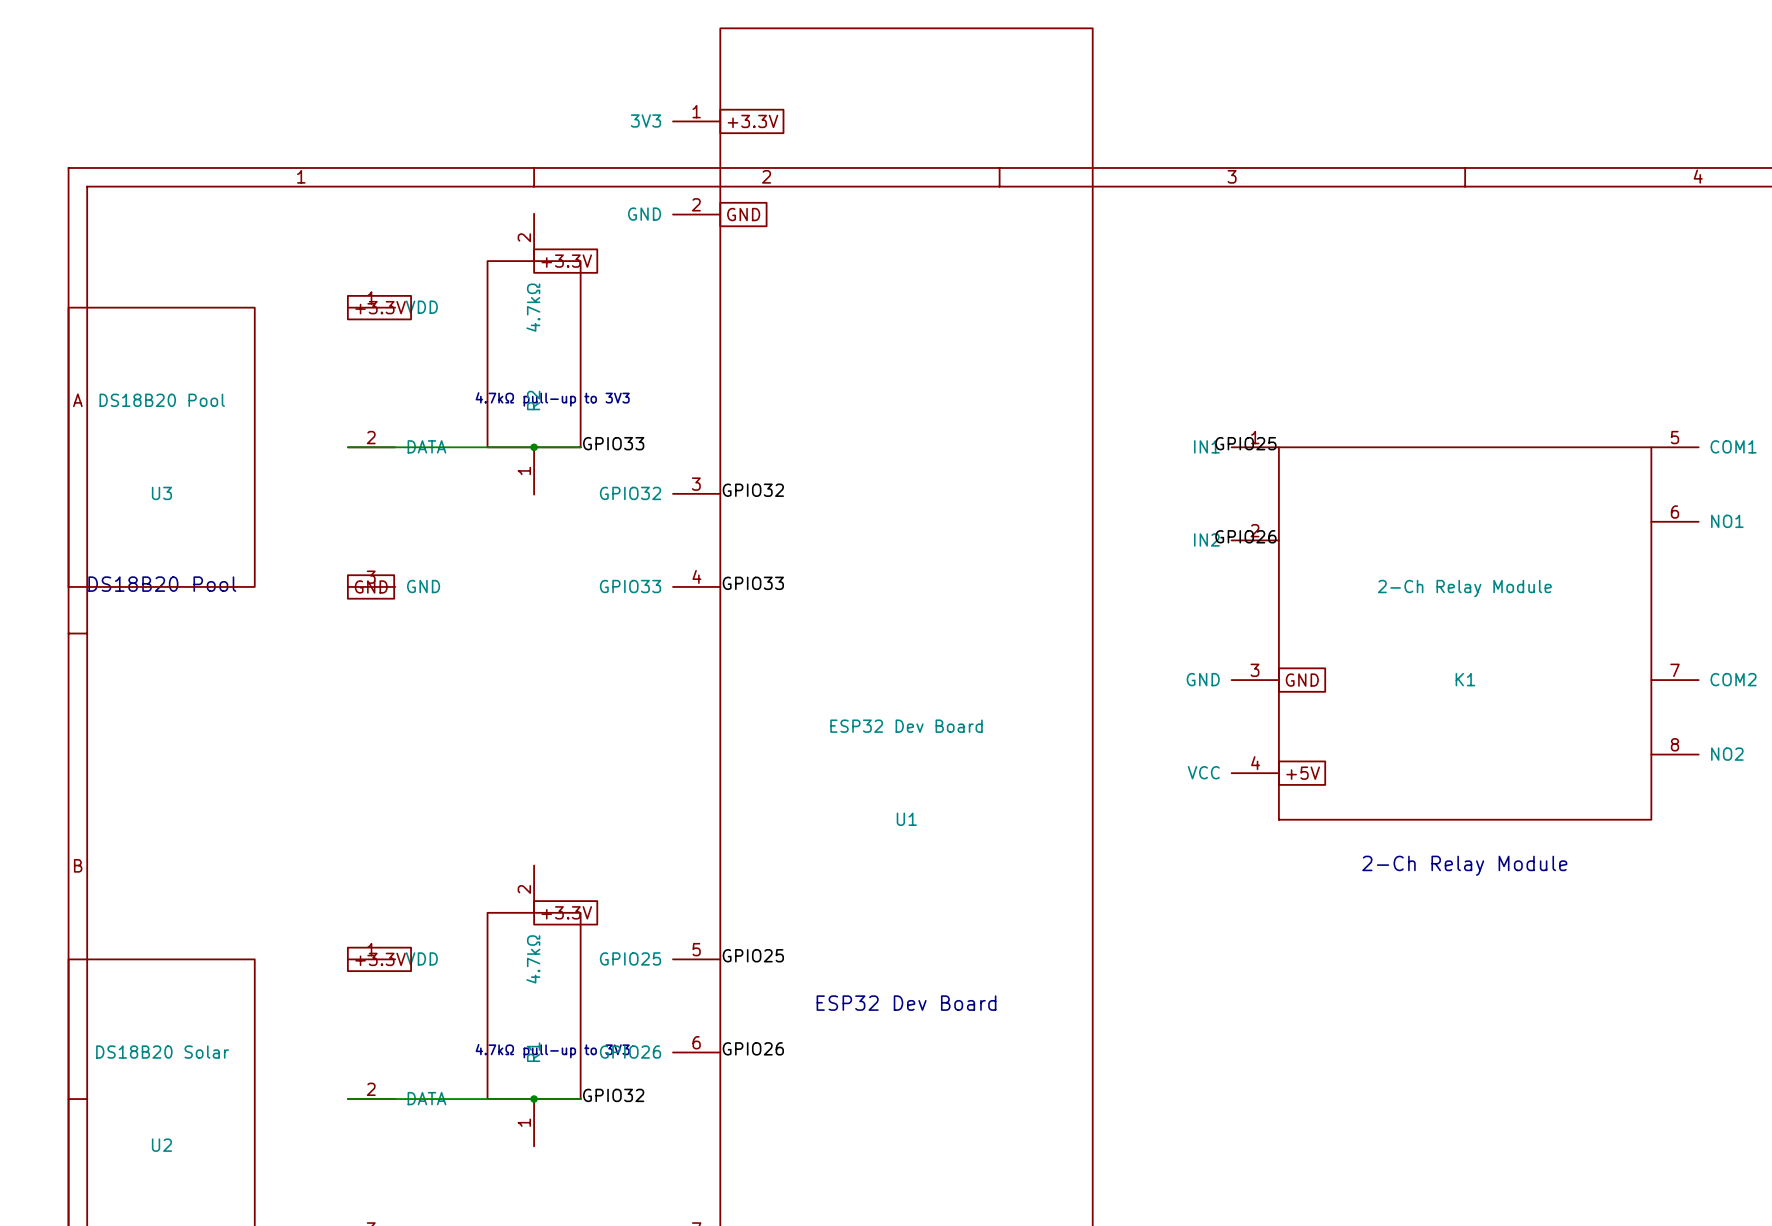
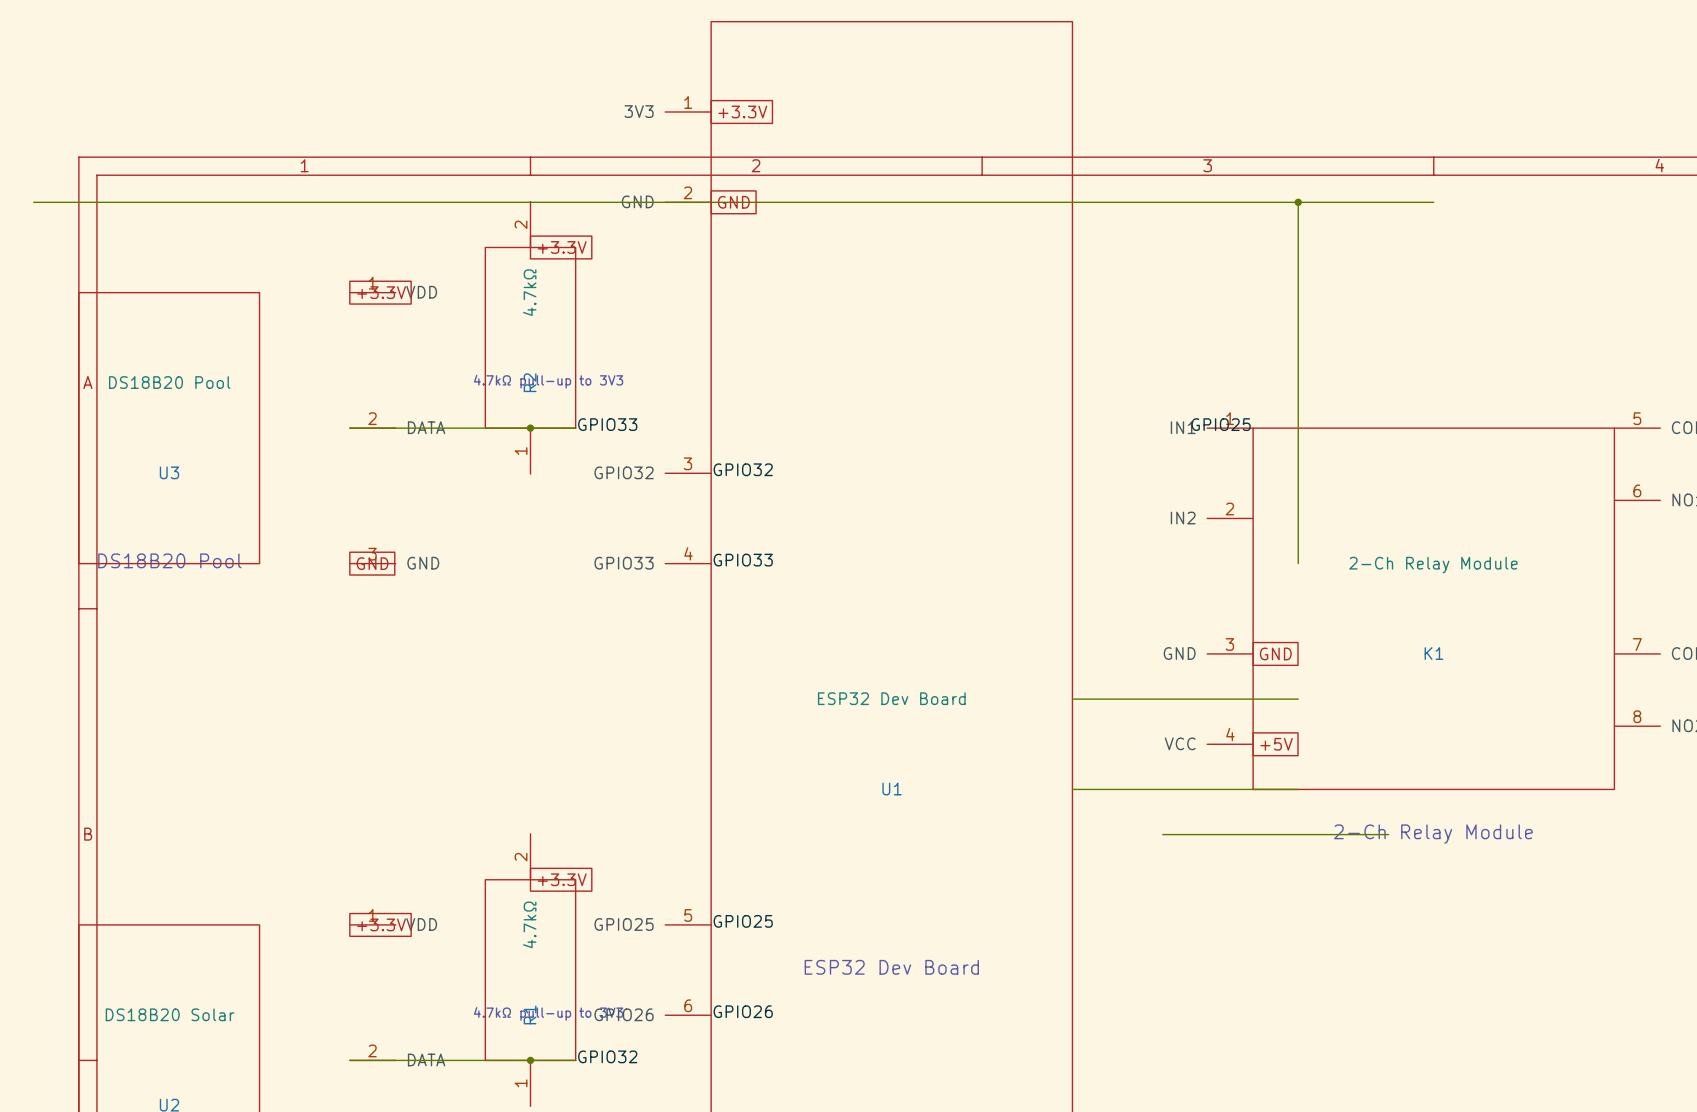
wire: none -> (33, 202) (1433, 202)
wire: none -> (1298, 202) (1298, 563)
junction: none -> (1298, 202)
label: GPIO26 (1245, 536) -> none
wire: none -> (1072, 699) (1298, 699)
wire: none -> (1072, 789) (1298, 789)
wire: none -> (1162, 834) (1388, 834)

